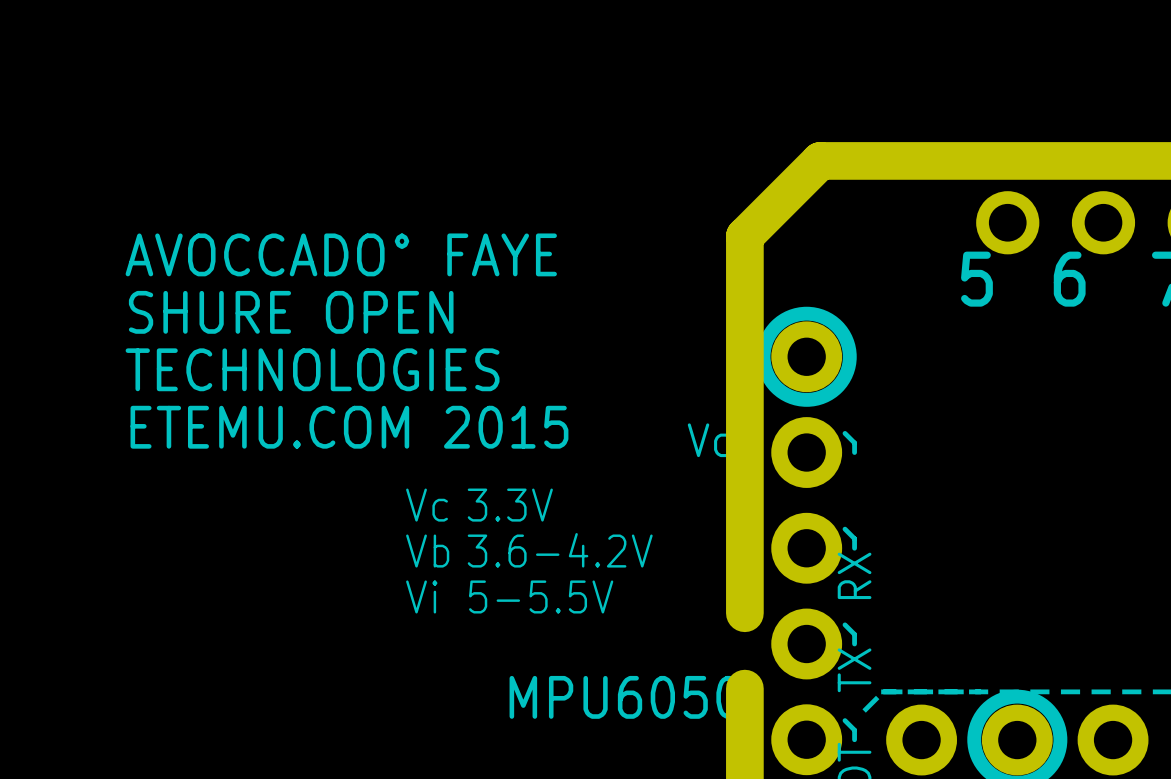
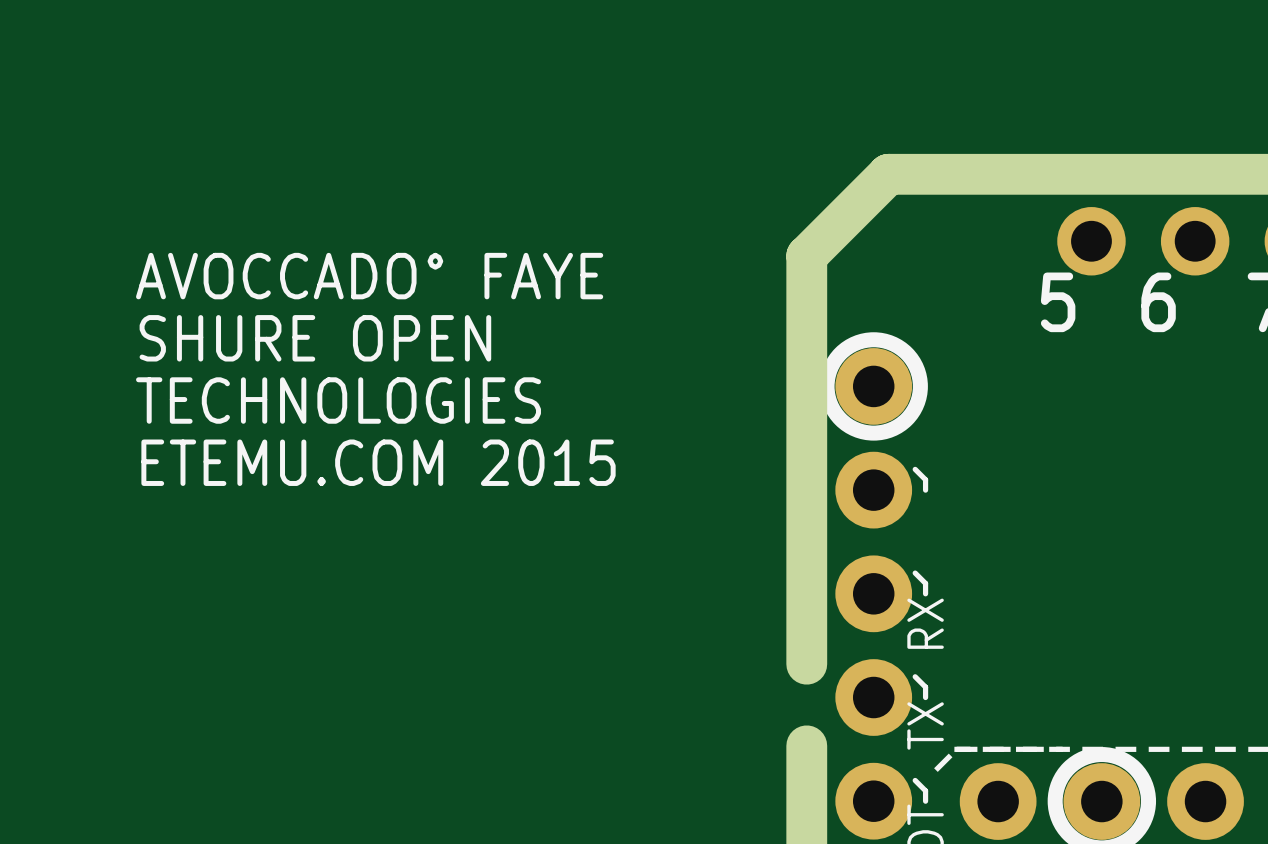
text: Vc (709, 440) -> none
text: Vc (427, 505) -> none
text: 3.3V (510, 505) -> none
text: 3.6-4.2V (560, 550) -> none
text: Vb (427, 551) -> none
text: Vi (421, 596) -> none
text: 5-5.5V (541, 596) -> none
text: MPU6050 (625, 697) -> none

